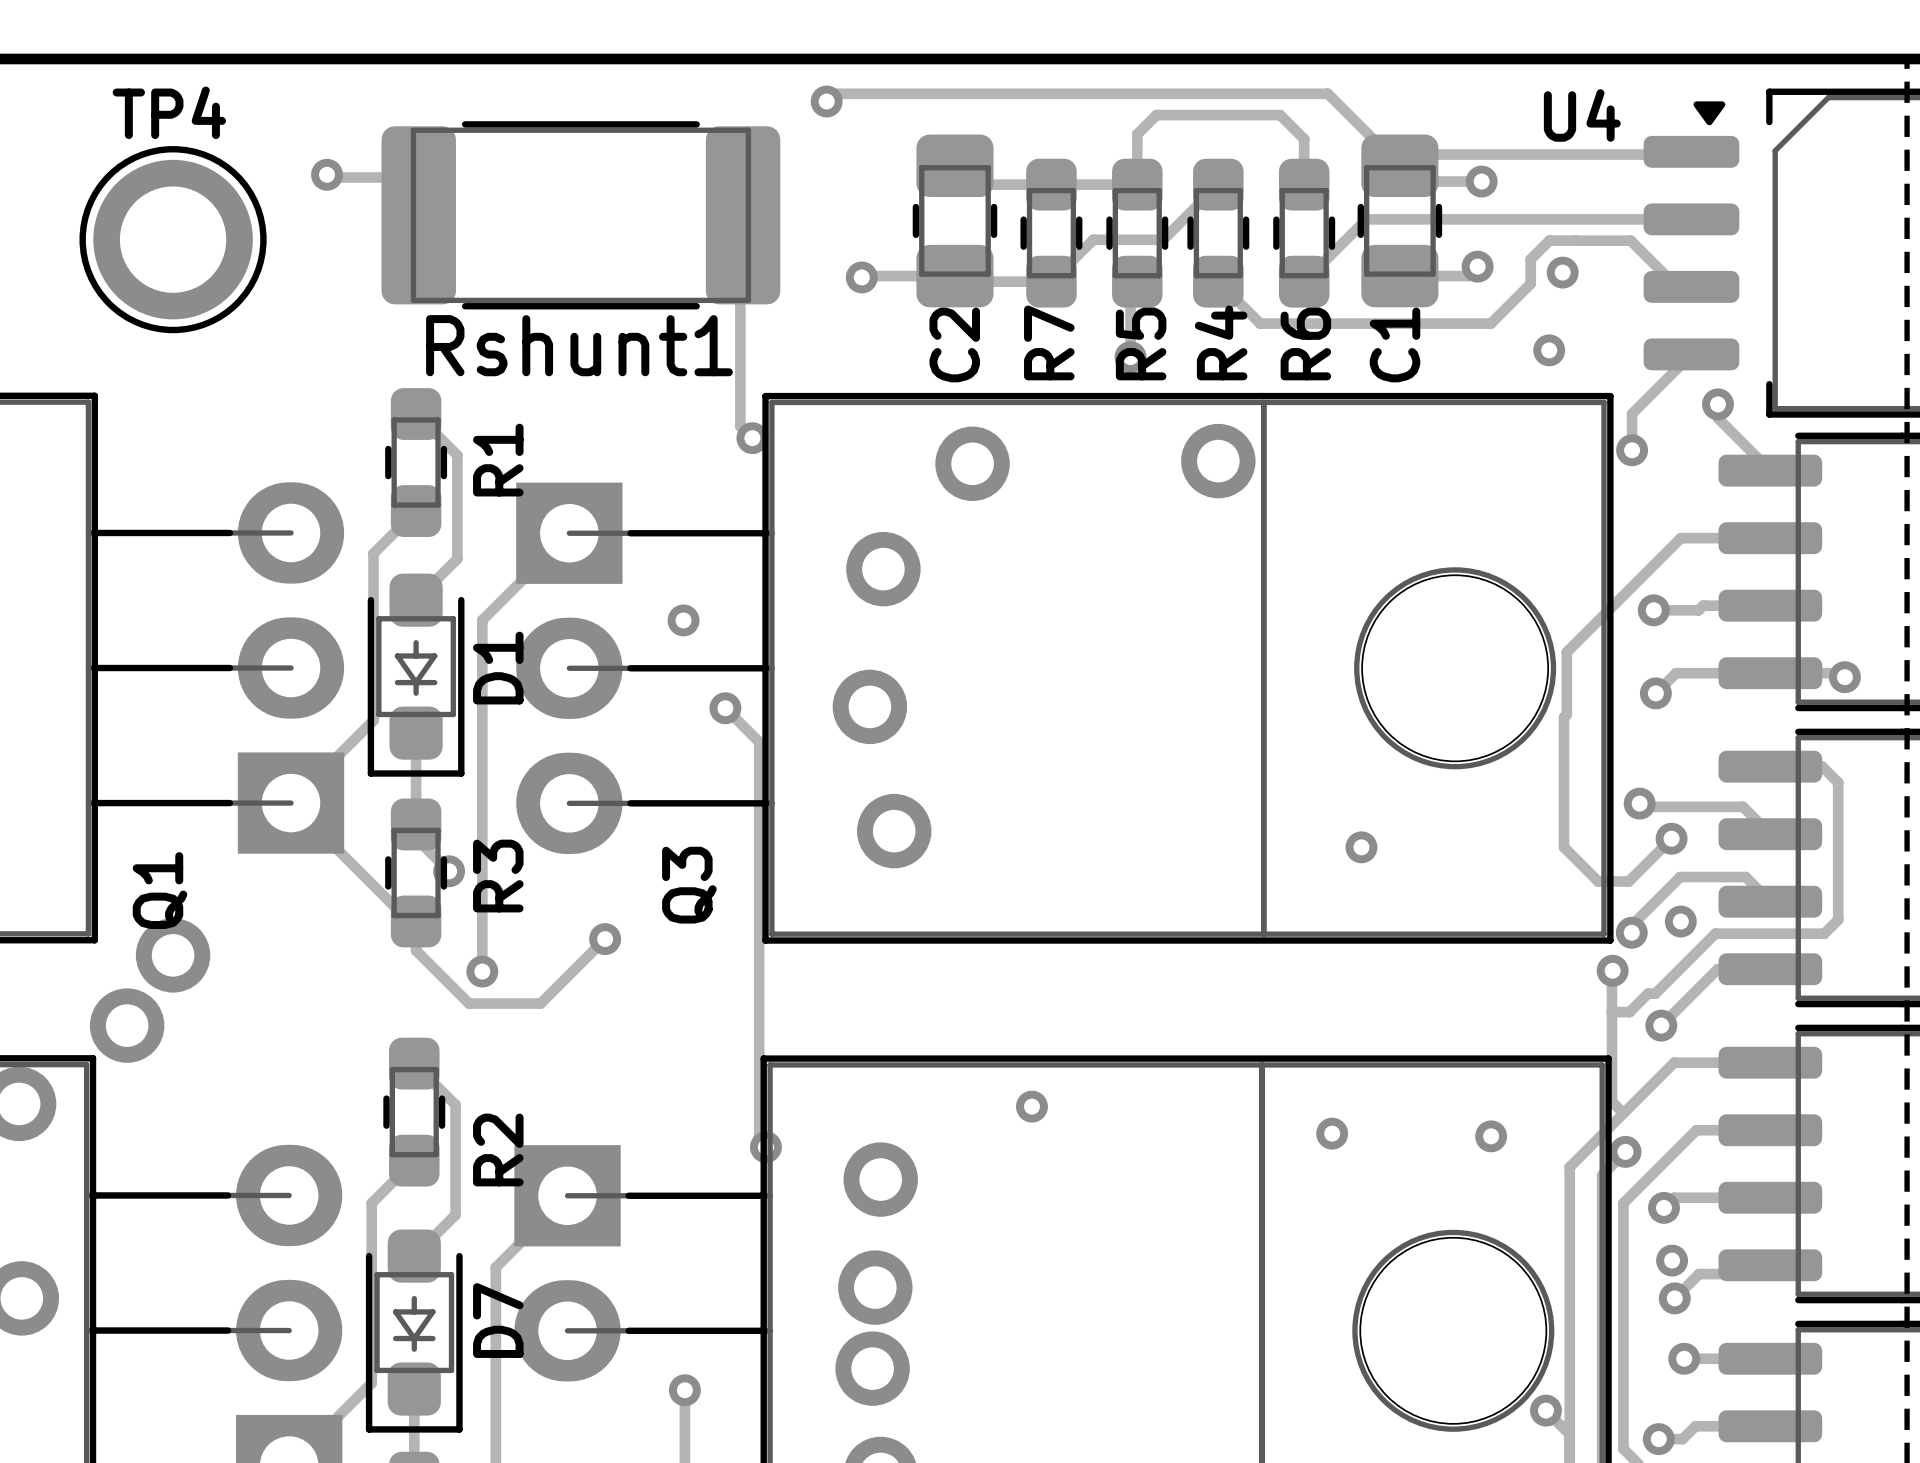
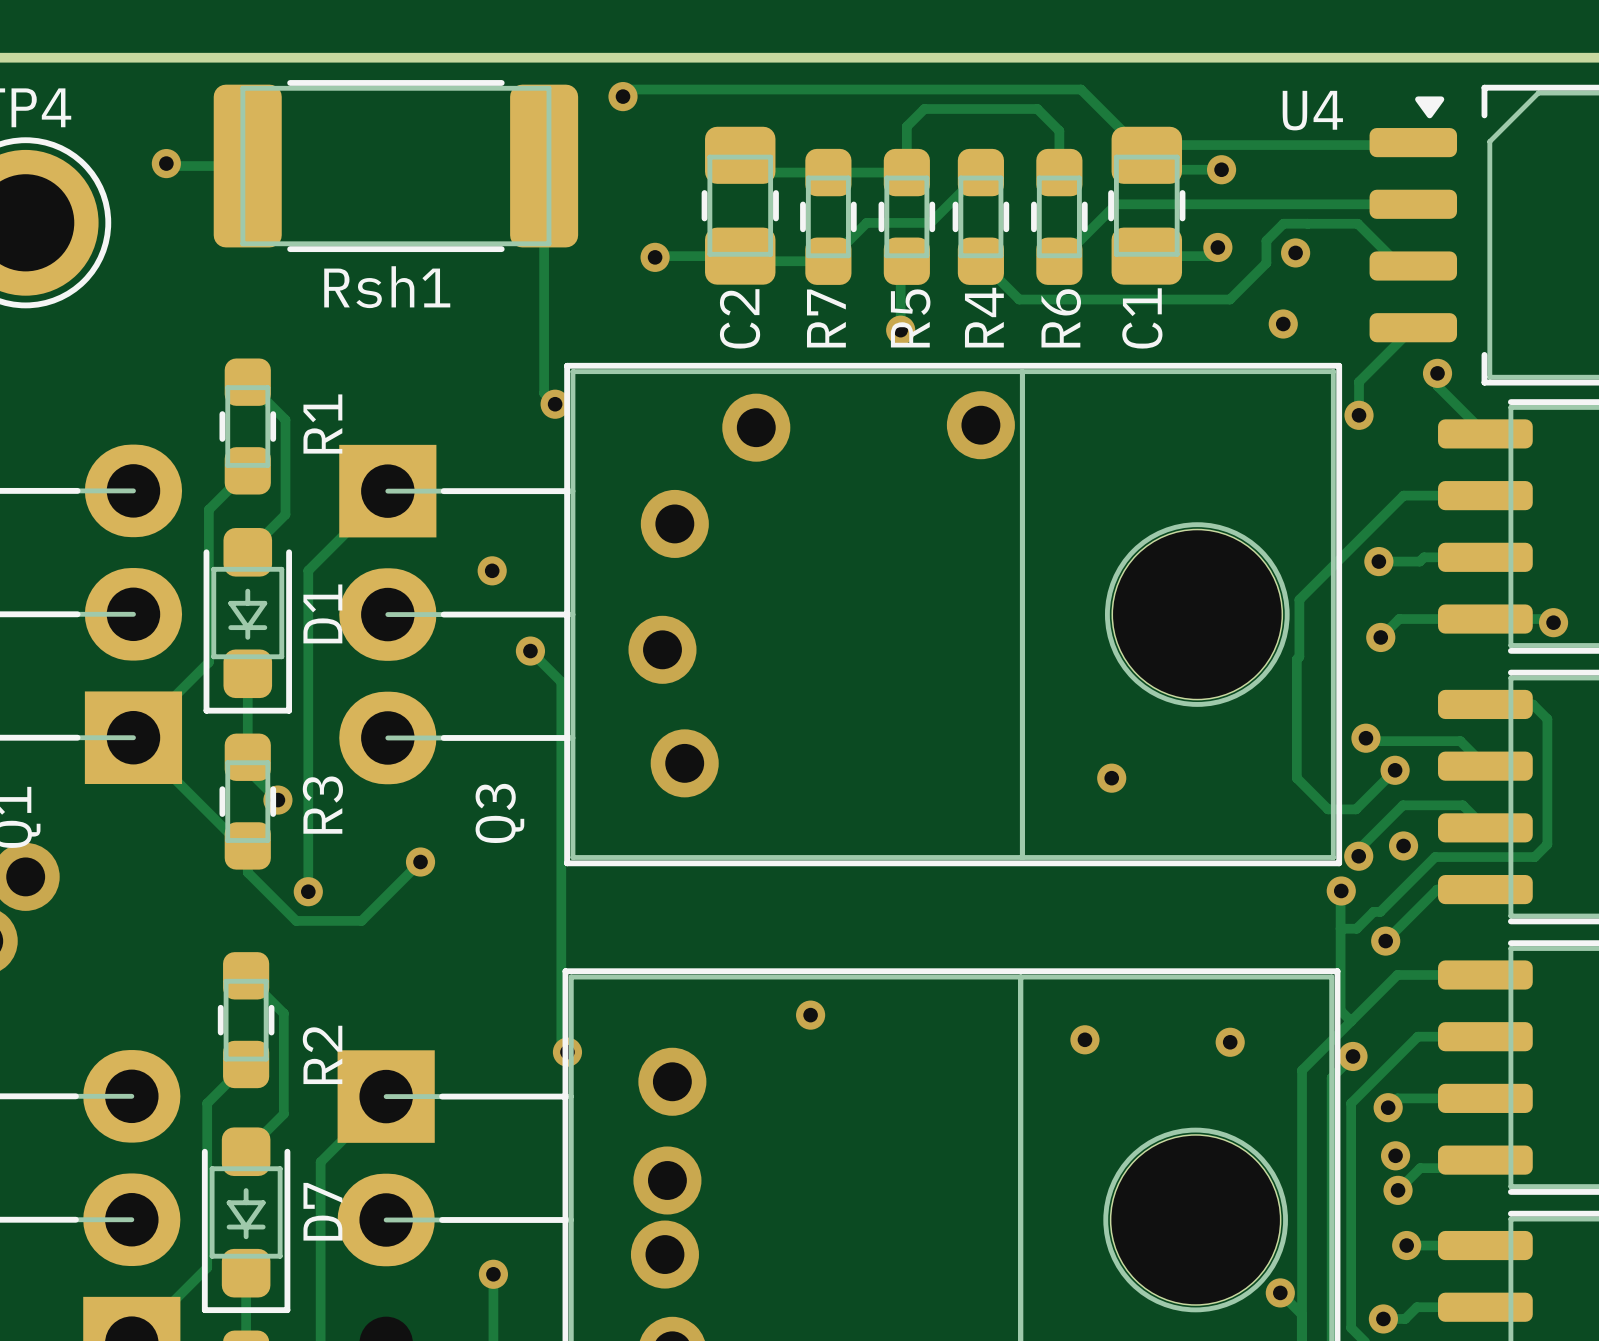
Rshunt1 position: (580, 215) -> (395, 166)
Rshunt1 name: Rshunt1 (579, 345) -> Rsh1 (387, 287)

